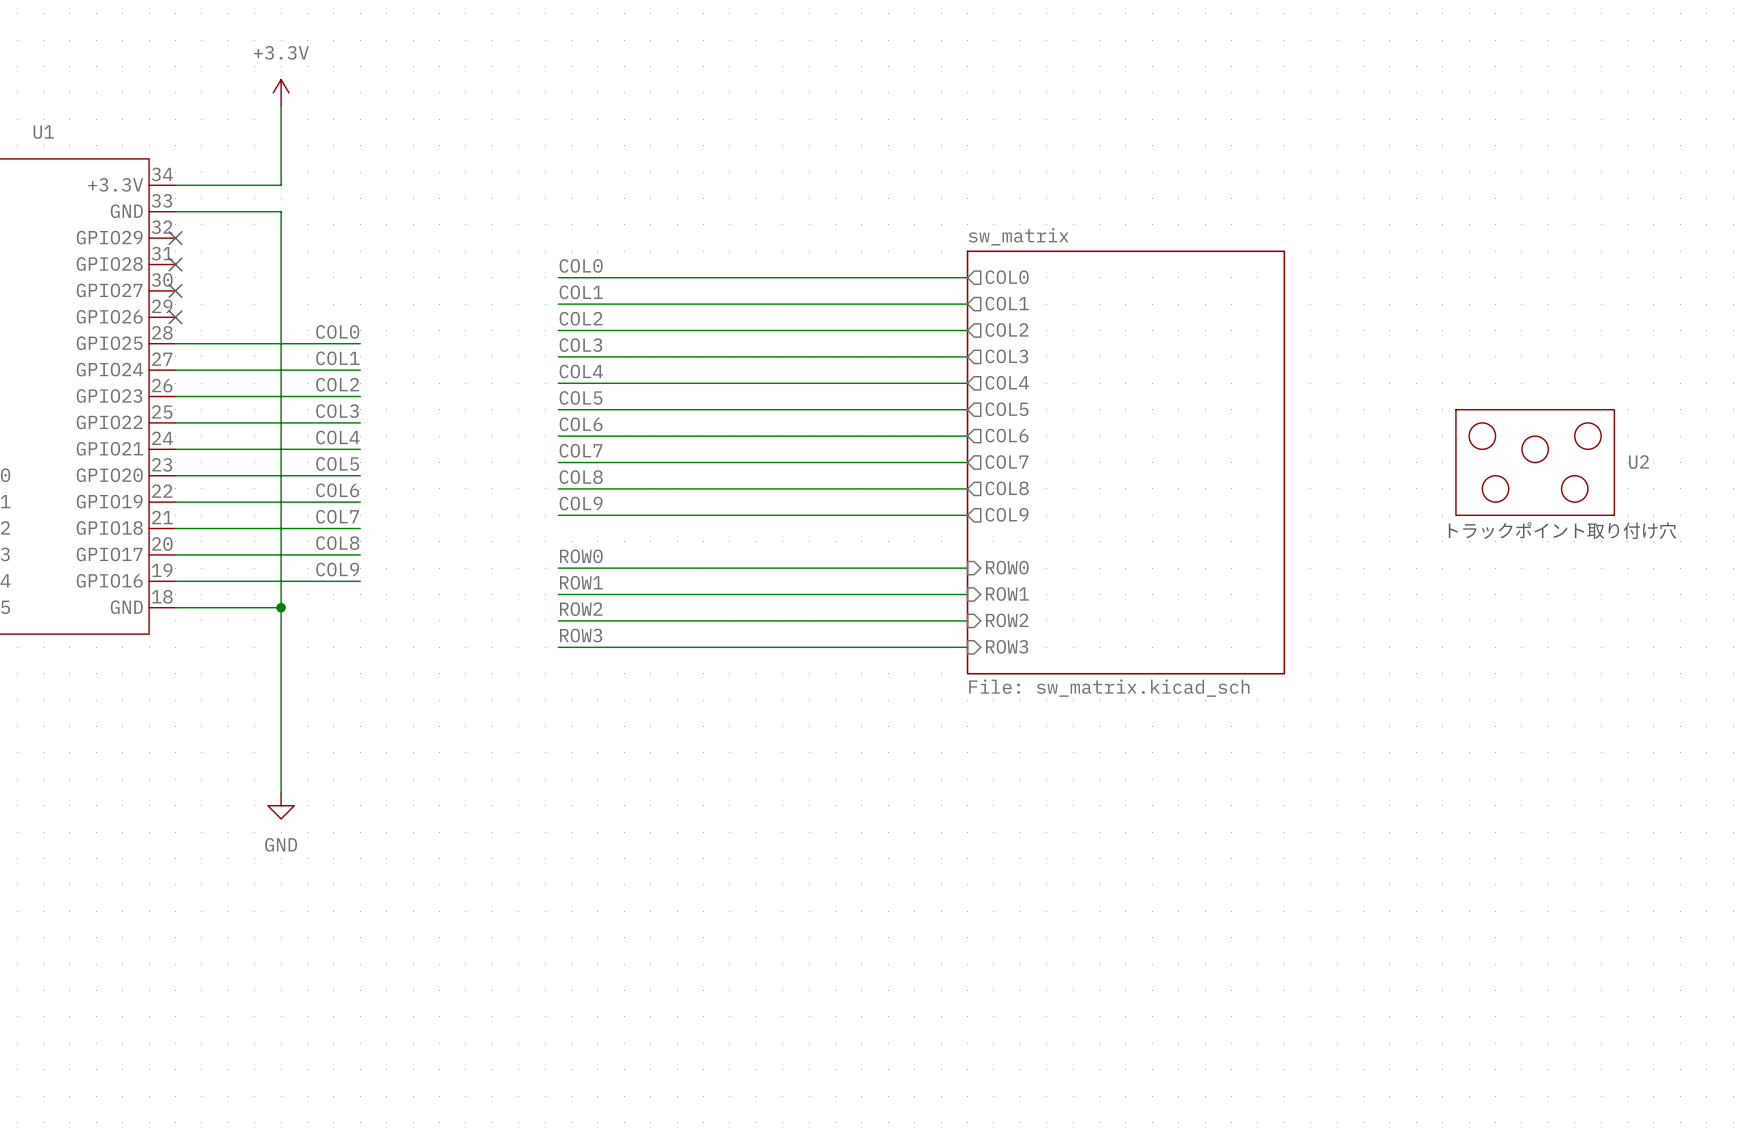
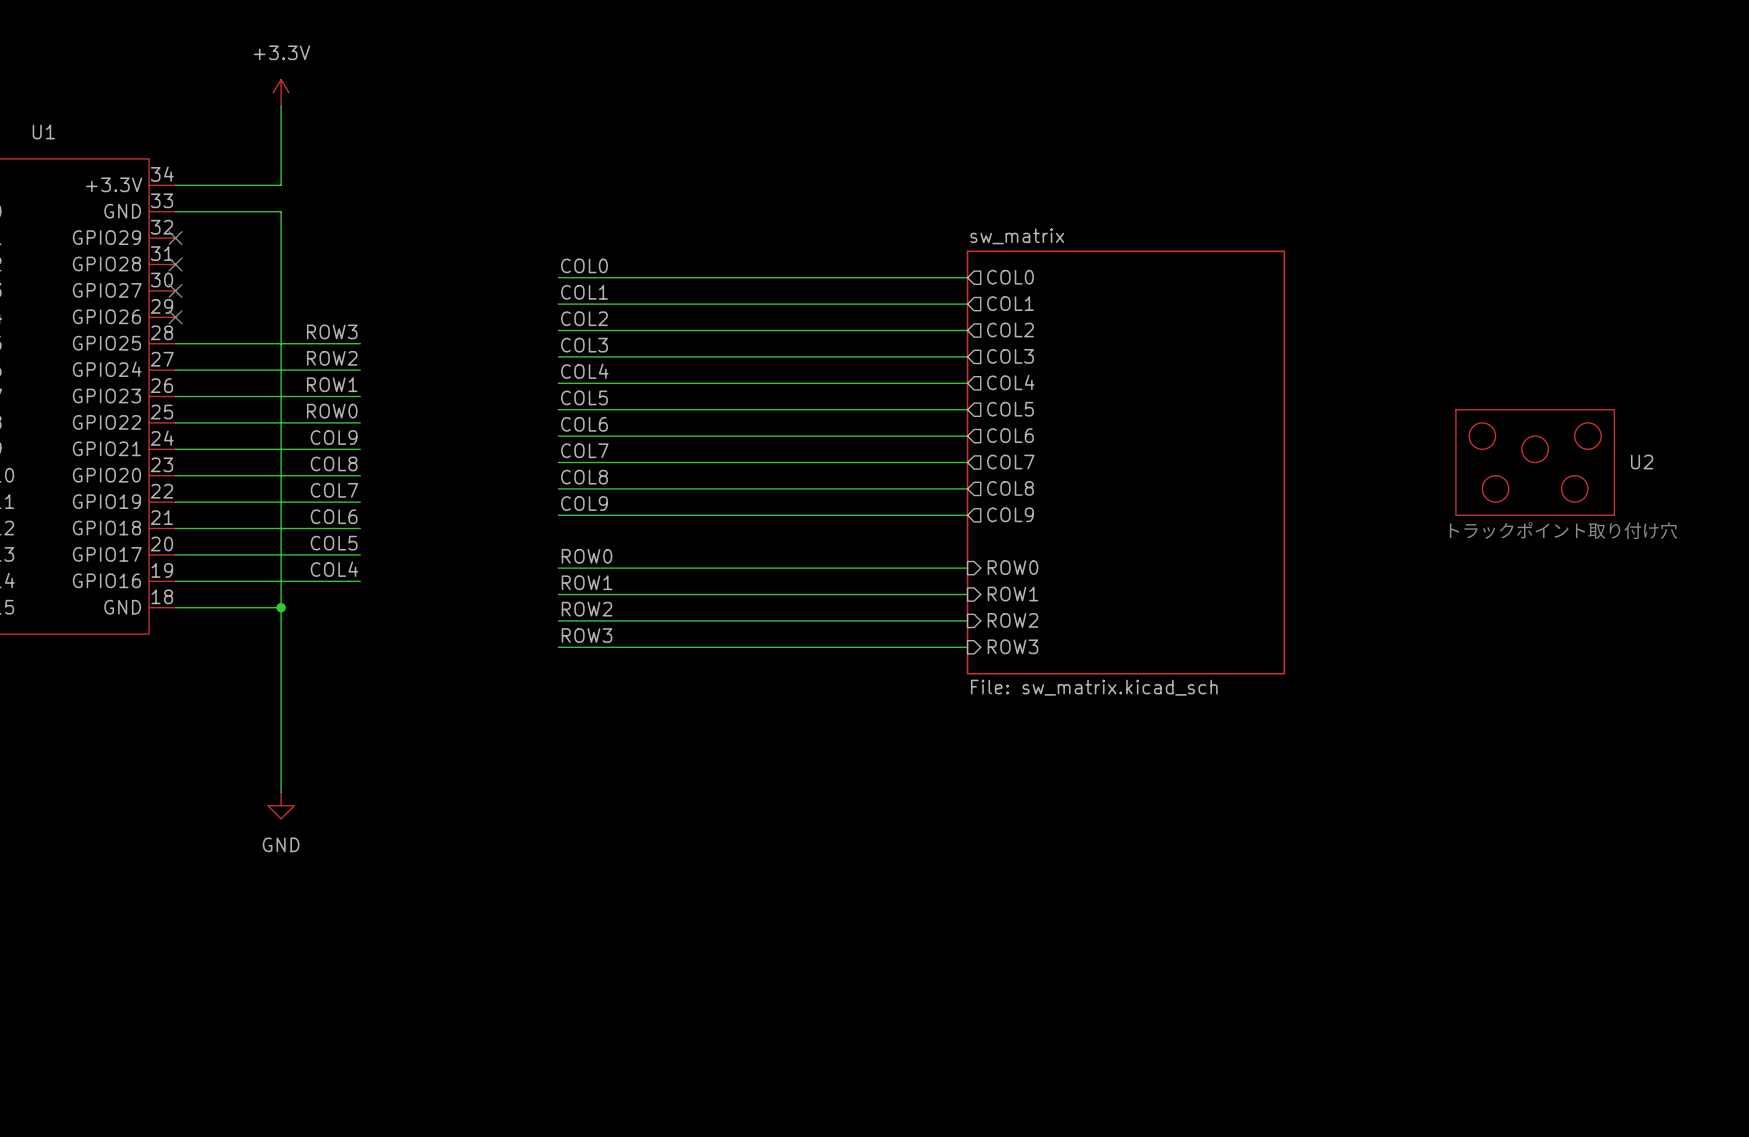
label: COL0 (337, 331) -> ROW3 (332, 331)
label: COL1 (337, 358) -> ROW2 (332, 358)
label: COL2 (337, 384) -> ROW1 (332, 384)
label: COL3 (337, 411) -> ROW0 (332, 411)
label: COL4 (337, 437) -> COL9 (334, 437)
label: COL5 (337, 463) -> COL8 (334, 463)
label: COL6 (337, 490) -> COL7 (334, 490)
label: COL7 (337, 516) -> COL6 (334, 516)
label: COL8 (337, 543) -> COL5 (334, 543)
label: COL9 (337, 569) -> COL4 (334, 569)

